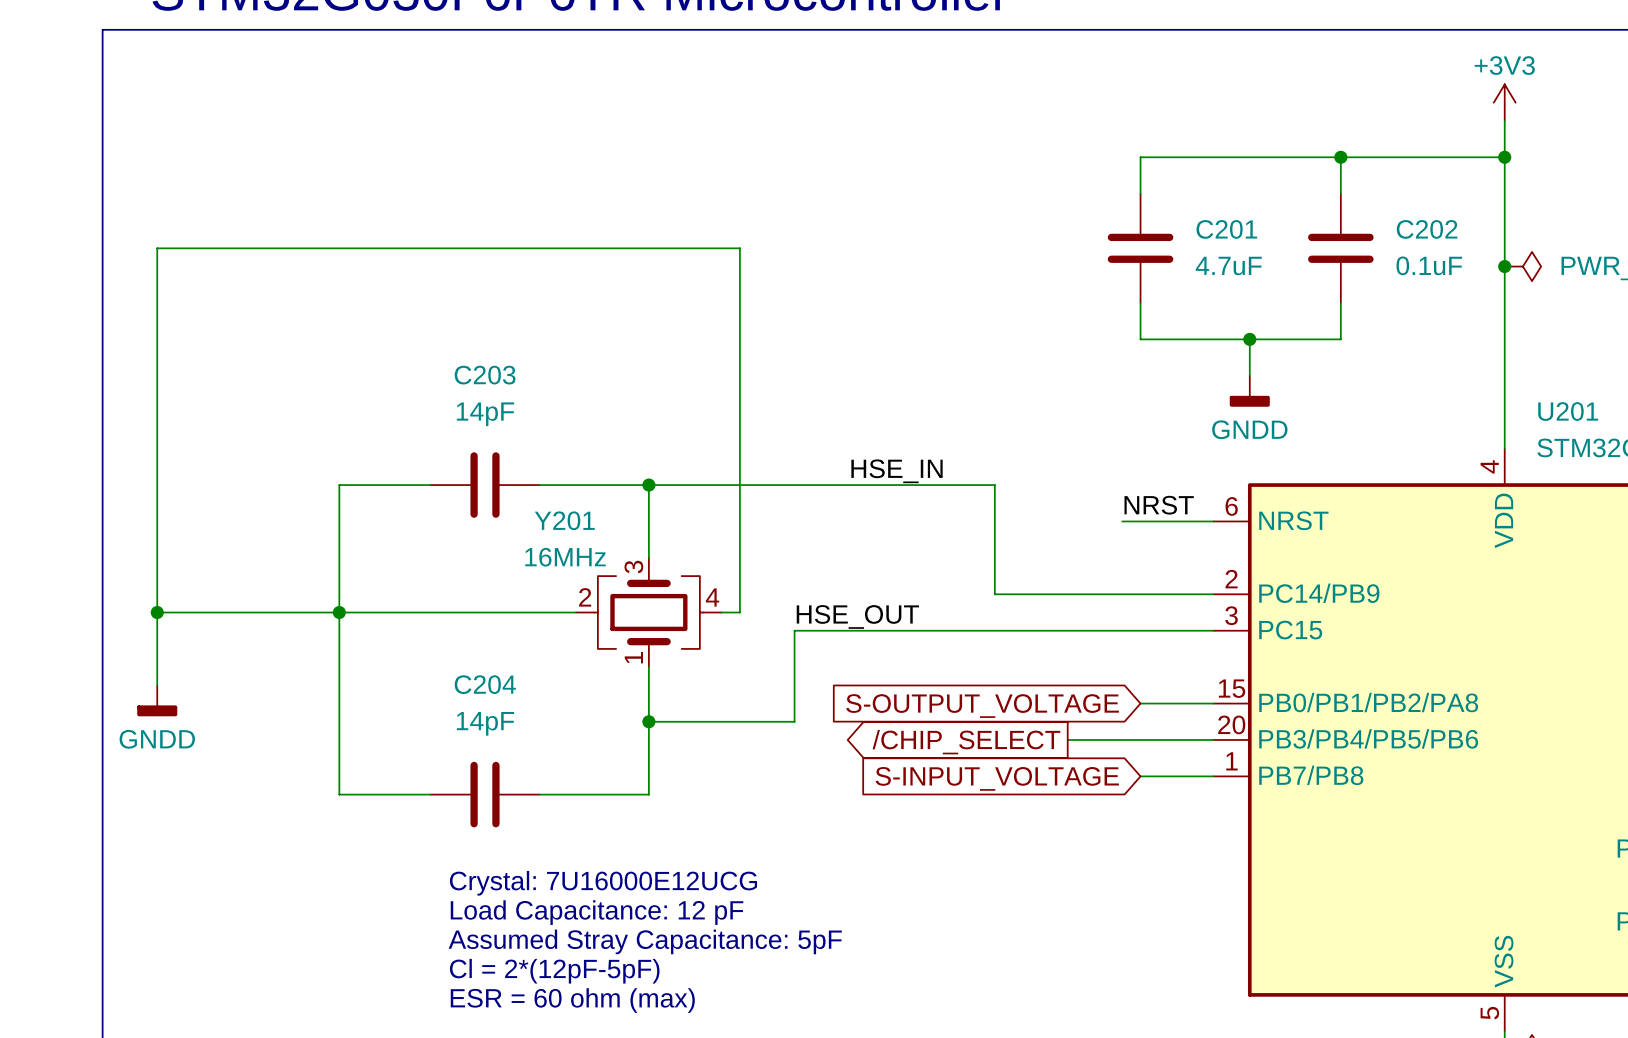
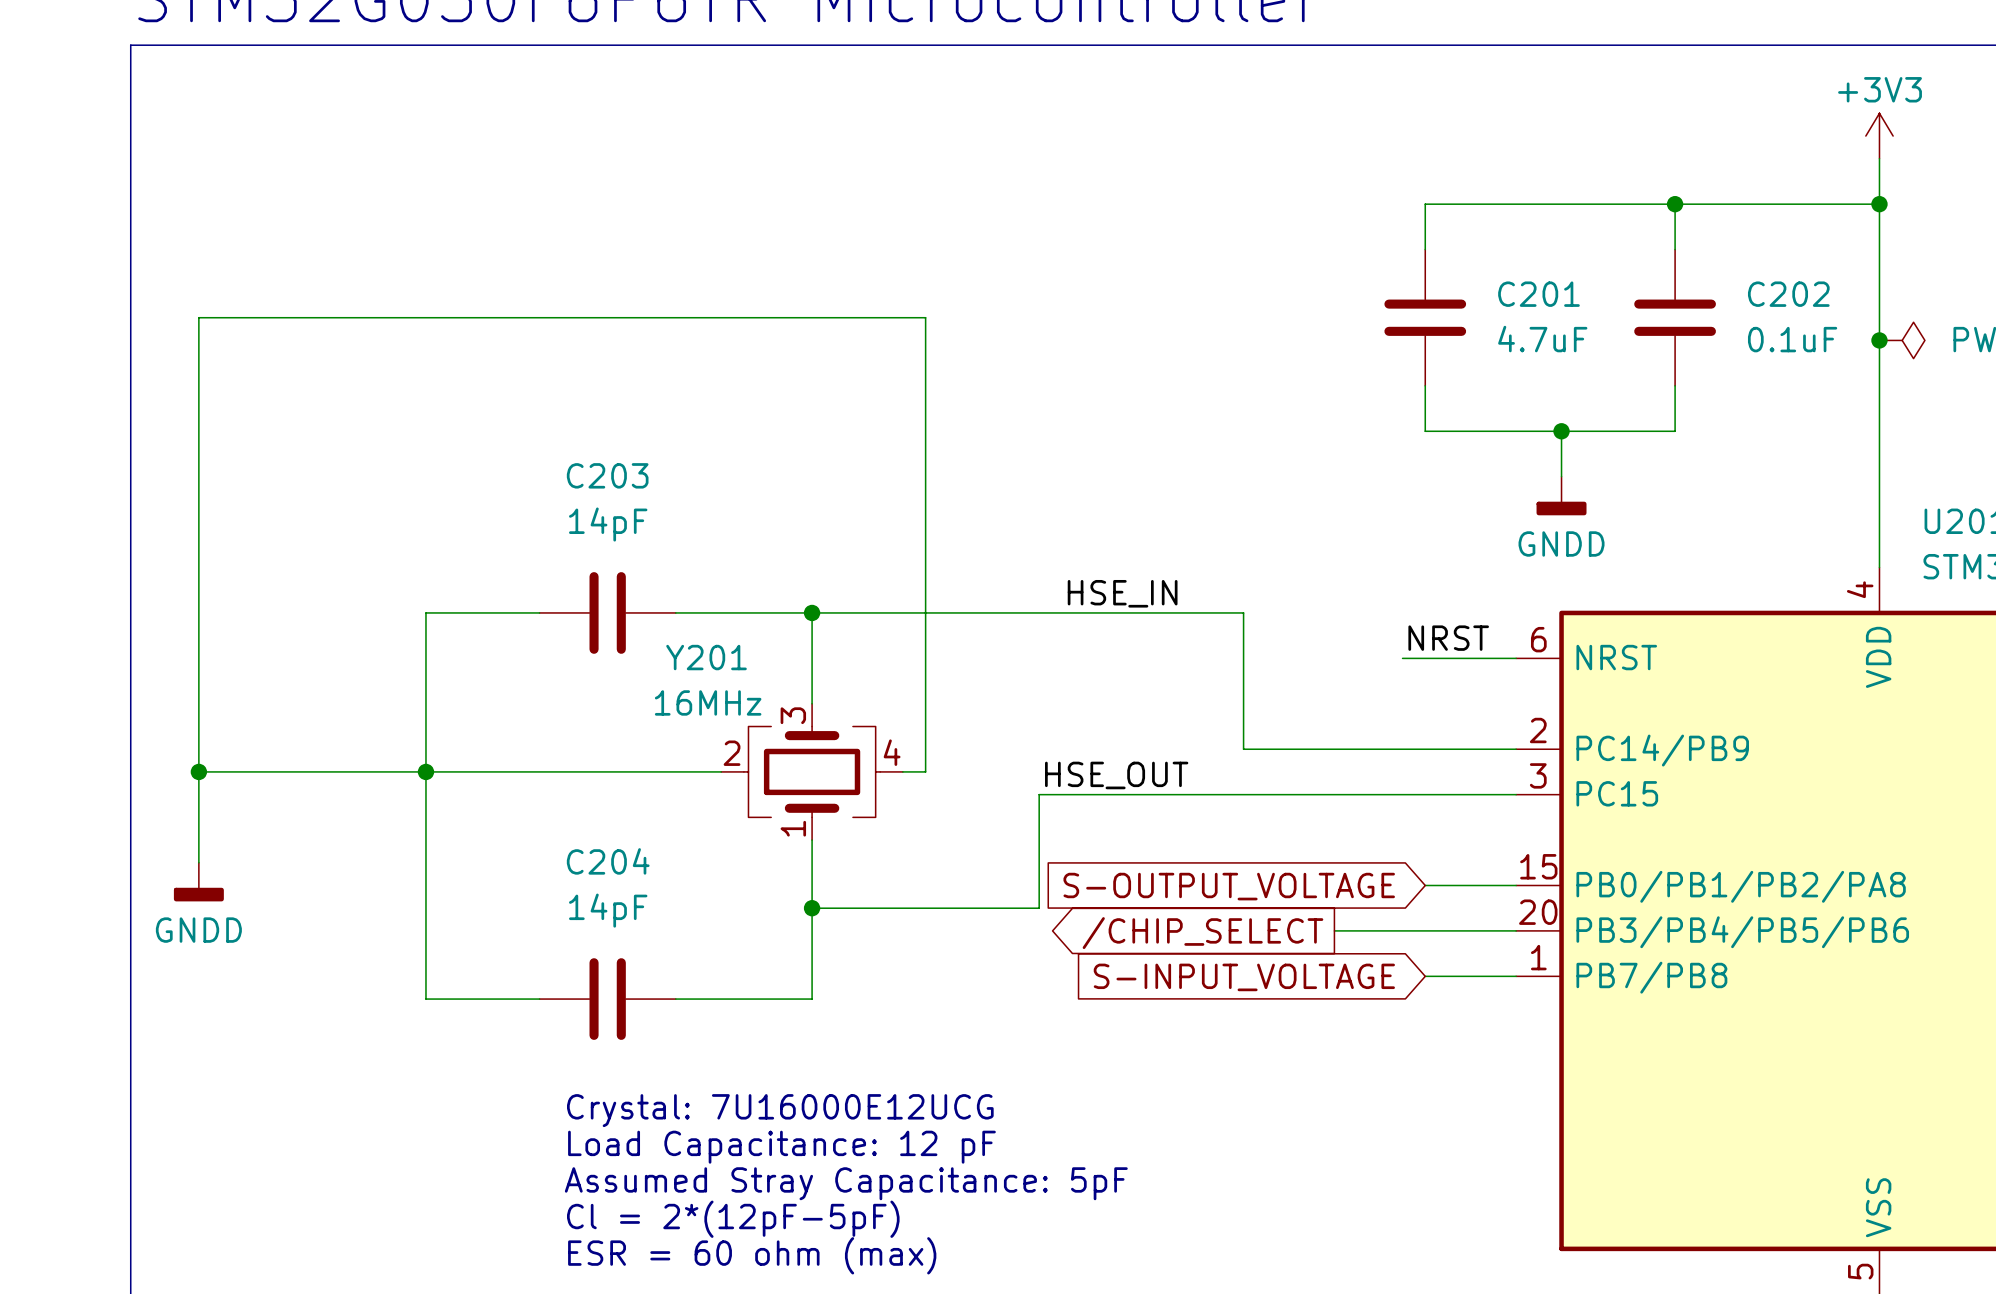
label position: HSE_OUT (857, 616) -> HSE_OUT (1116, 775)
wire: (830, 630) (794, 630) (794, 721) -> (1039, 794) (1039, 908) (993, 908)

